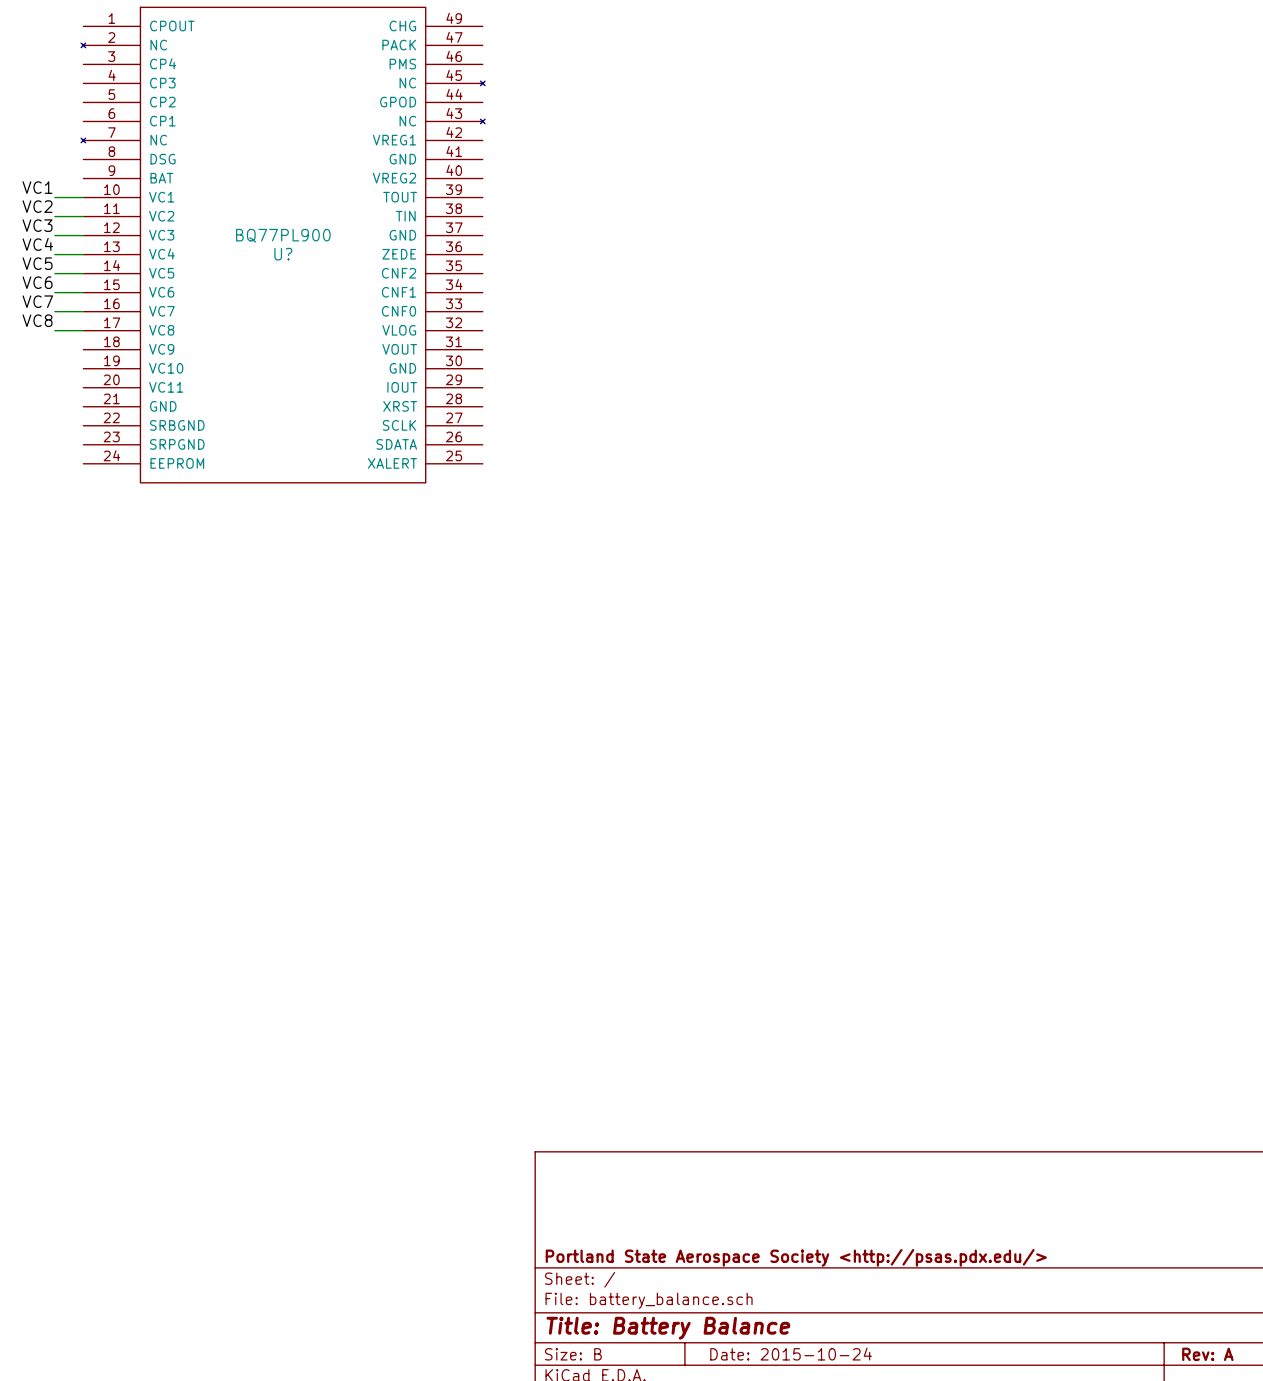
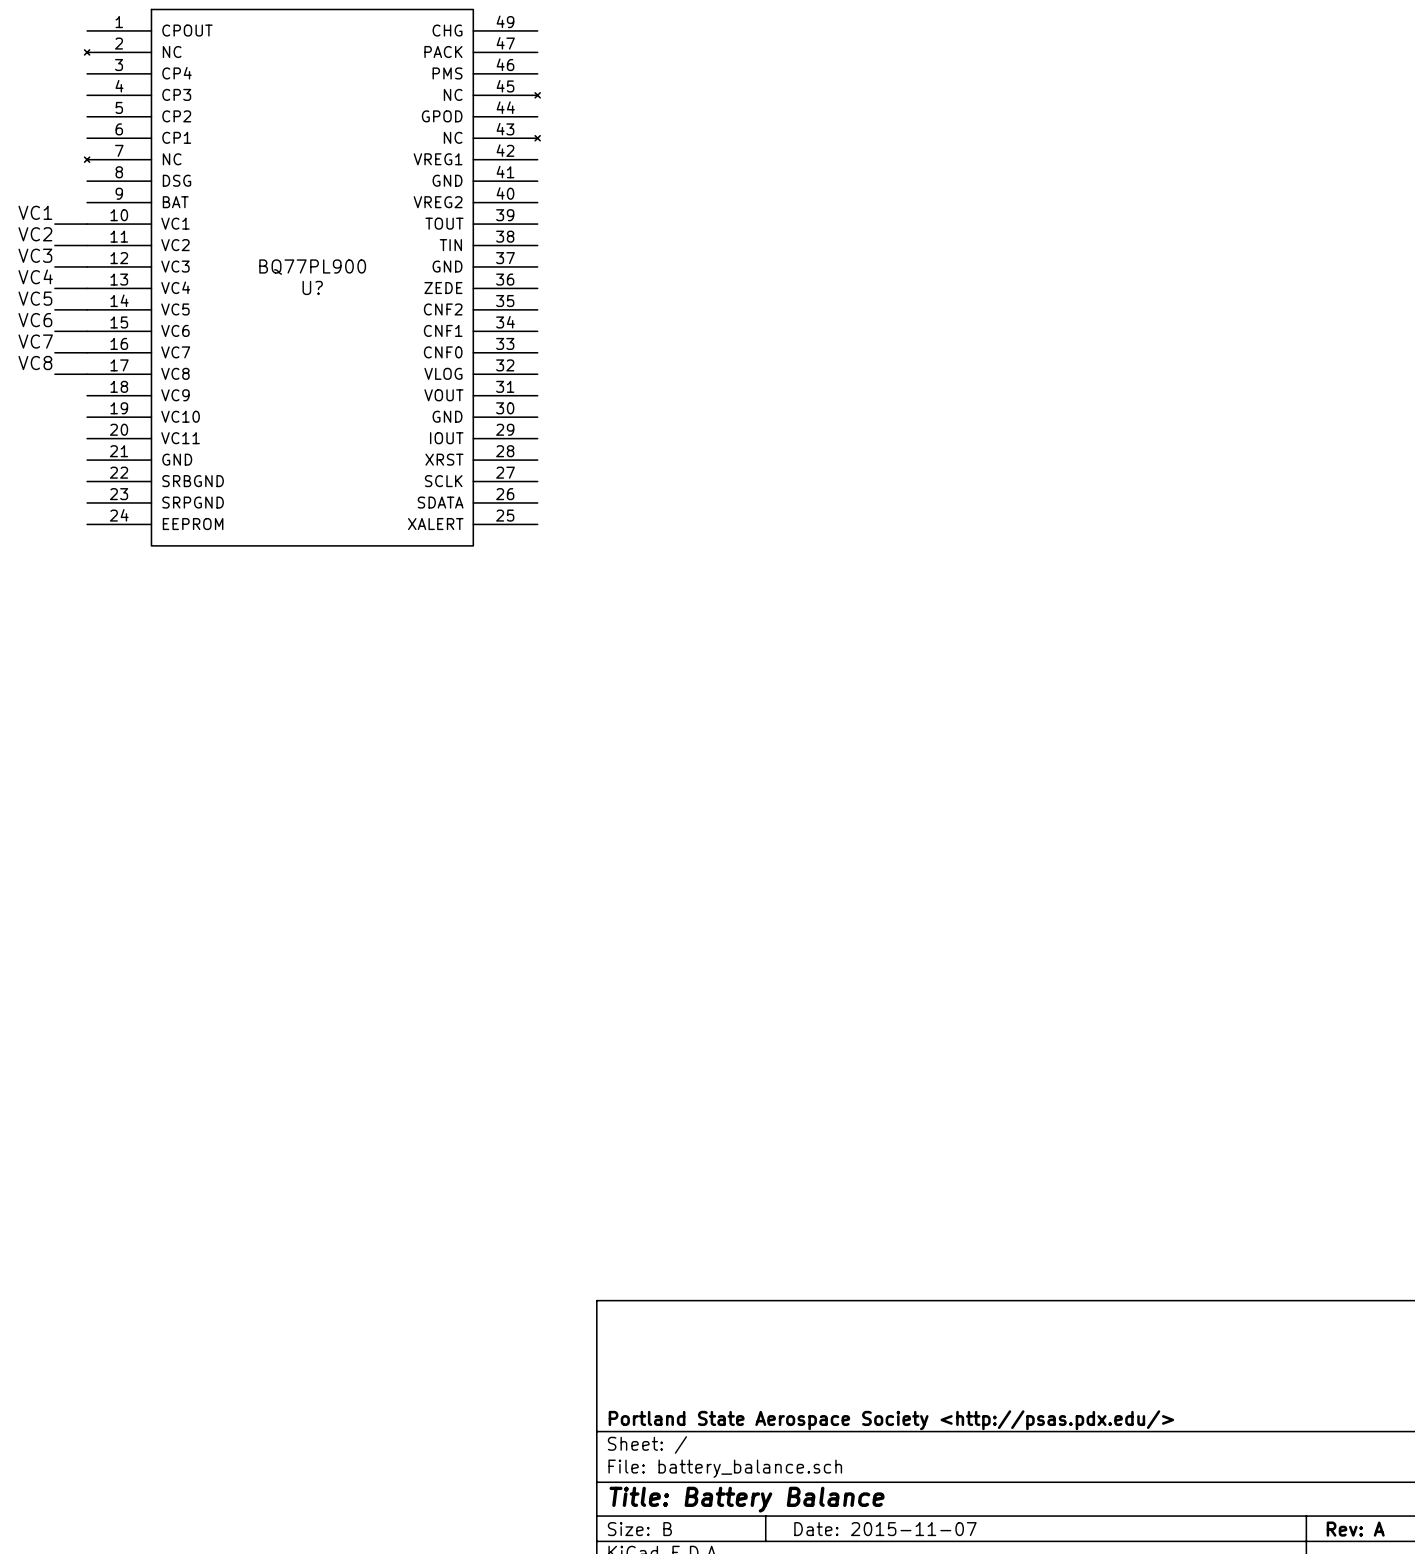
title block: Date: 2015-10-24 (791, 1354) -> Date: 2015-11-07 (885, 1529)

